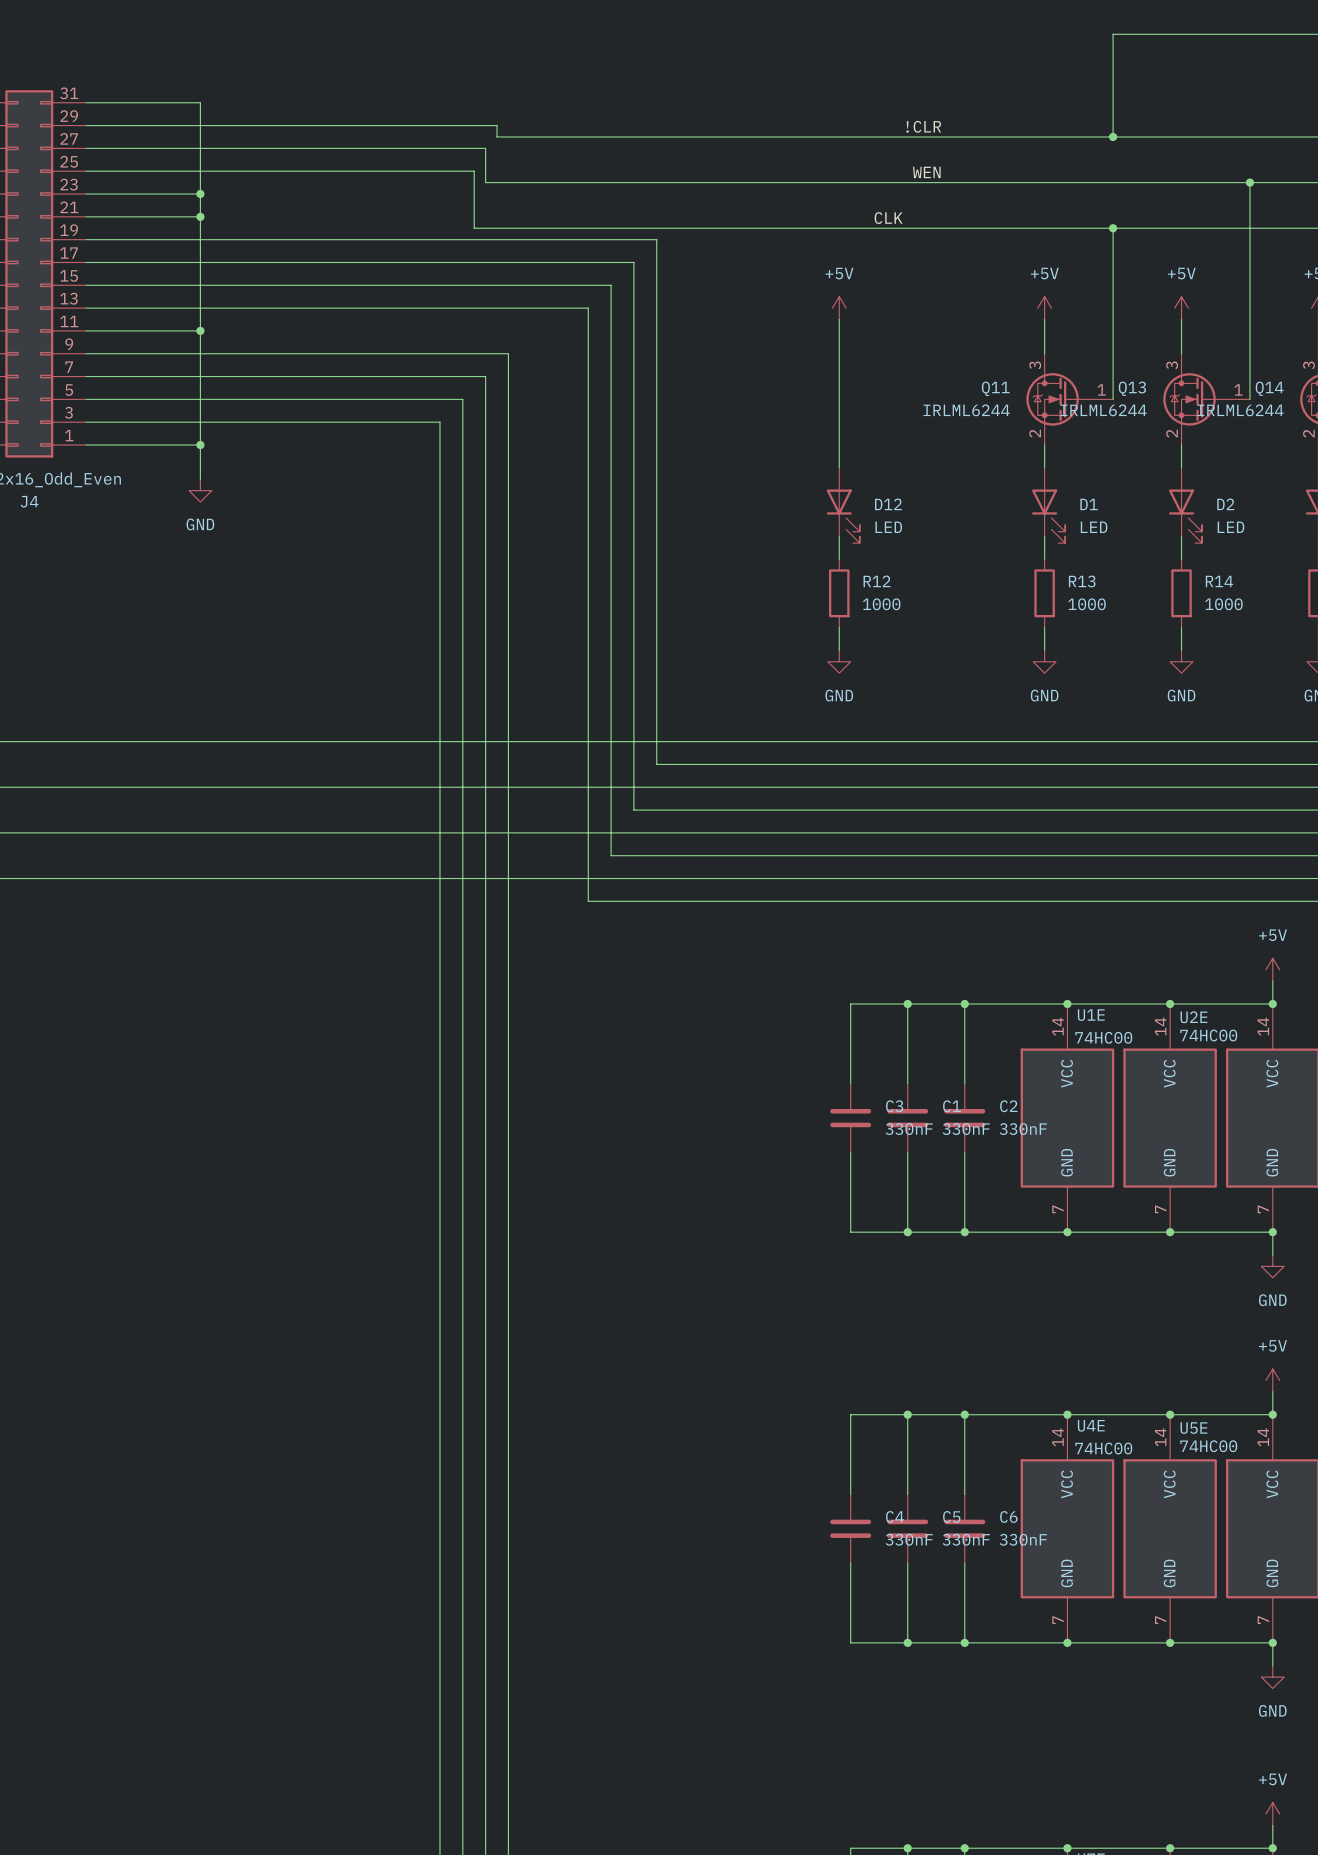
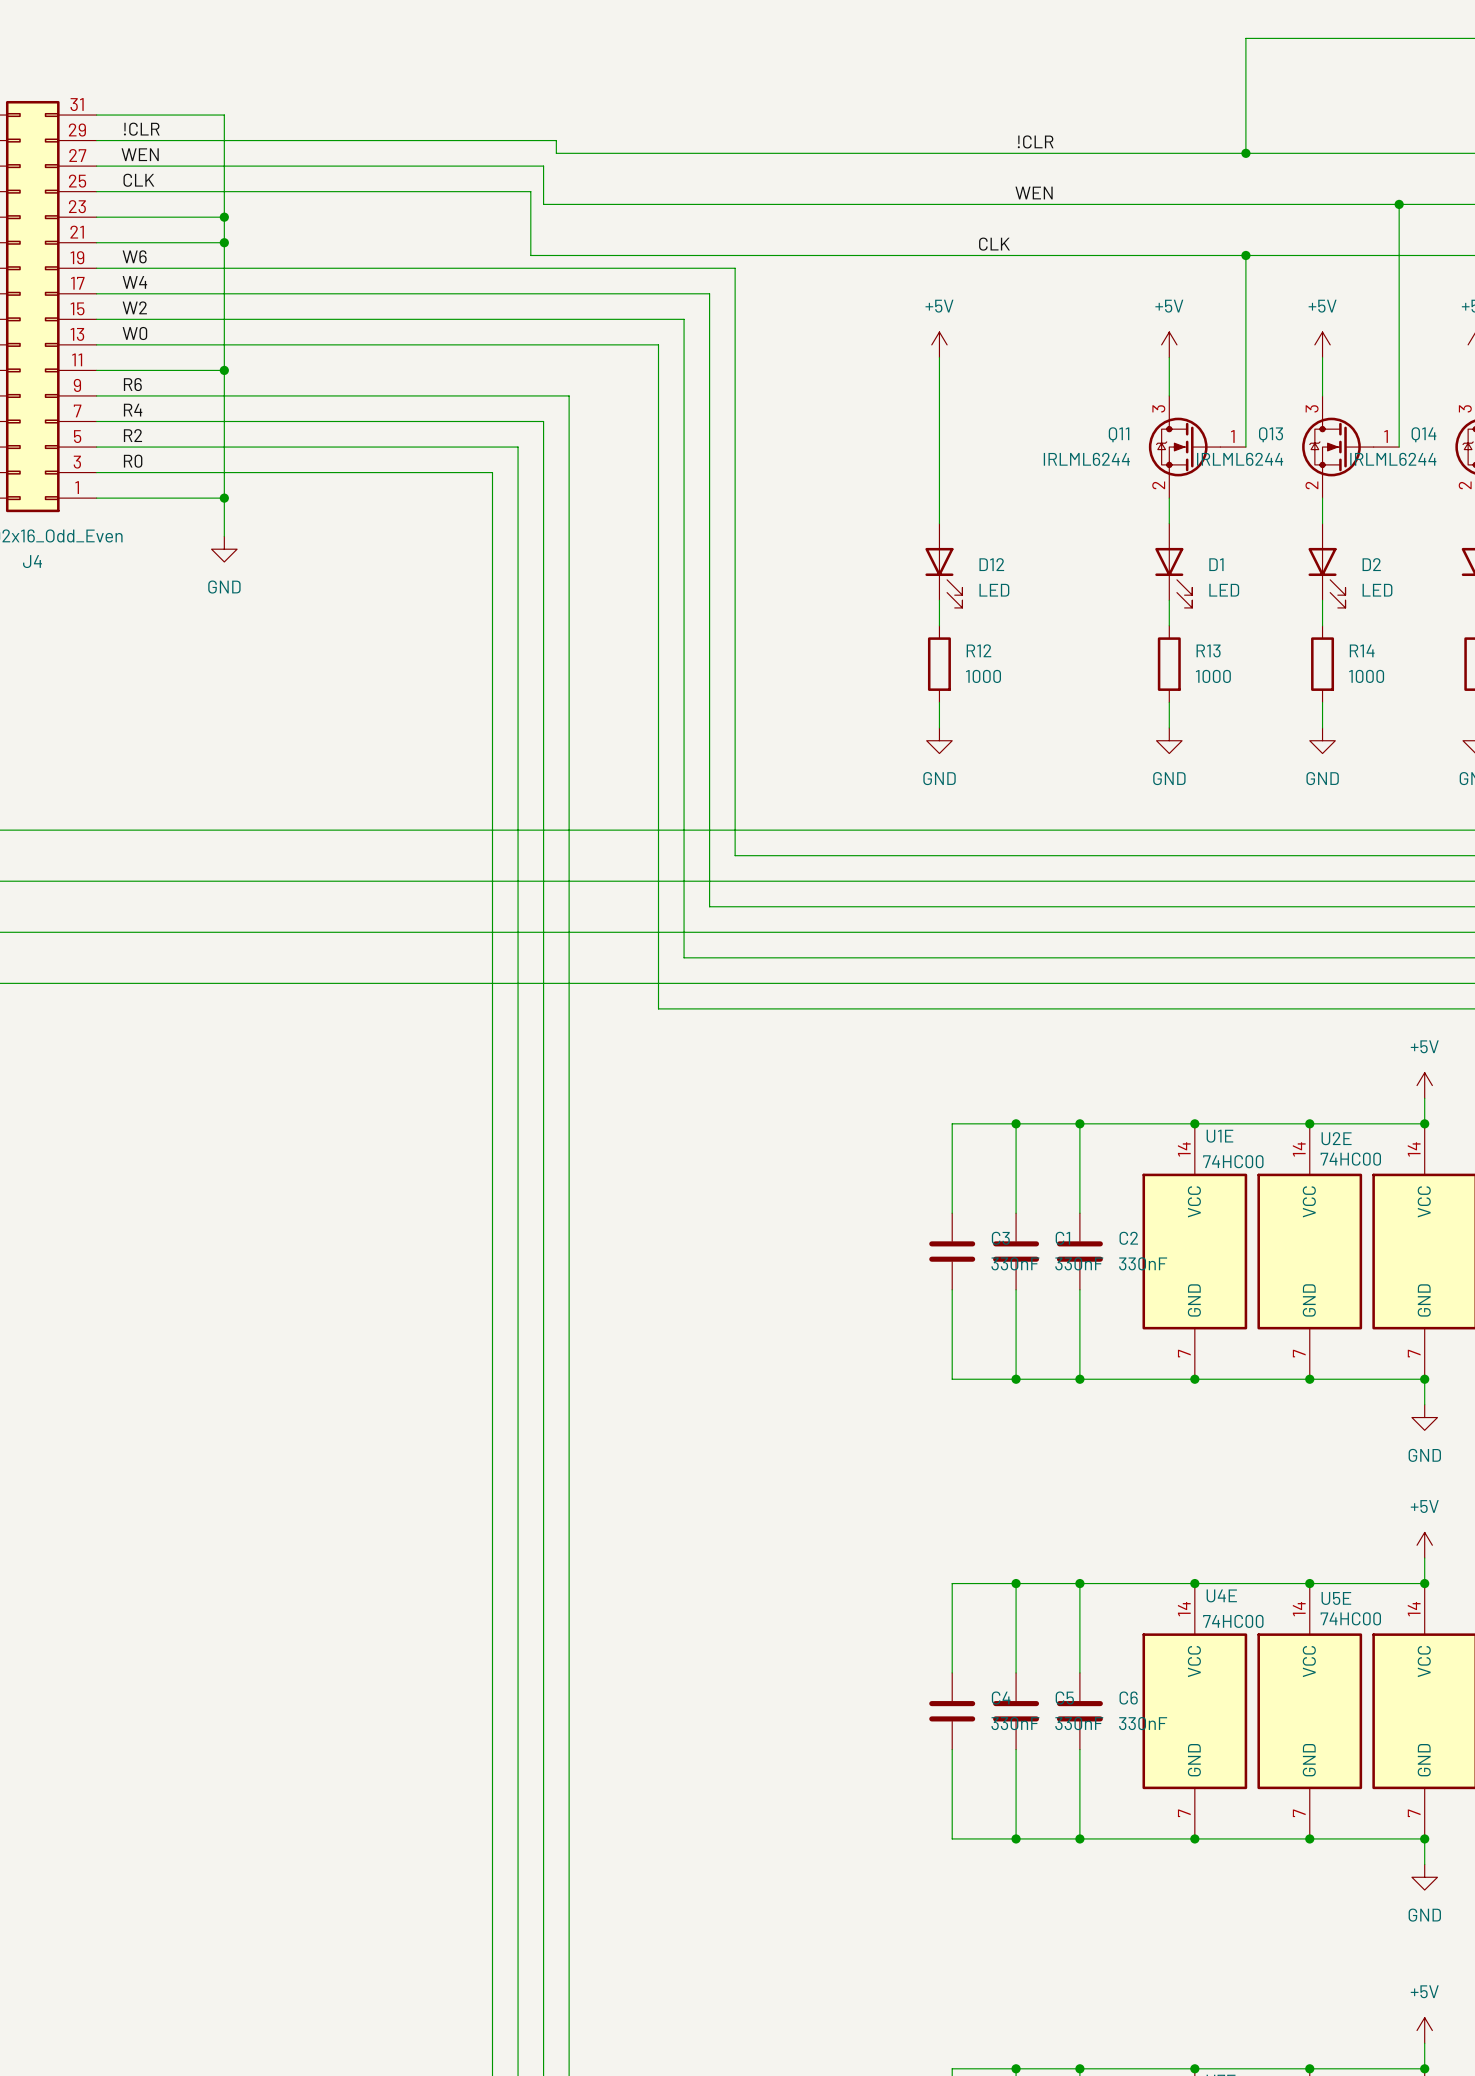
label: none -> !CLR (141, 129)
label: none -> WEN (140, 154)
label: none -> CLK (138, 180)
label: none -> W6 (134, 256)
label: none -> W4 (134, 282)
label: none -> W2 (134, 307)
label: none -> W0 (134, 333)
label: none -> R6 (132, 384)
label: none -> R4 (133, 410)
label: none -> R2 (132, 435)
label: none -> R0 (133, 461)

